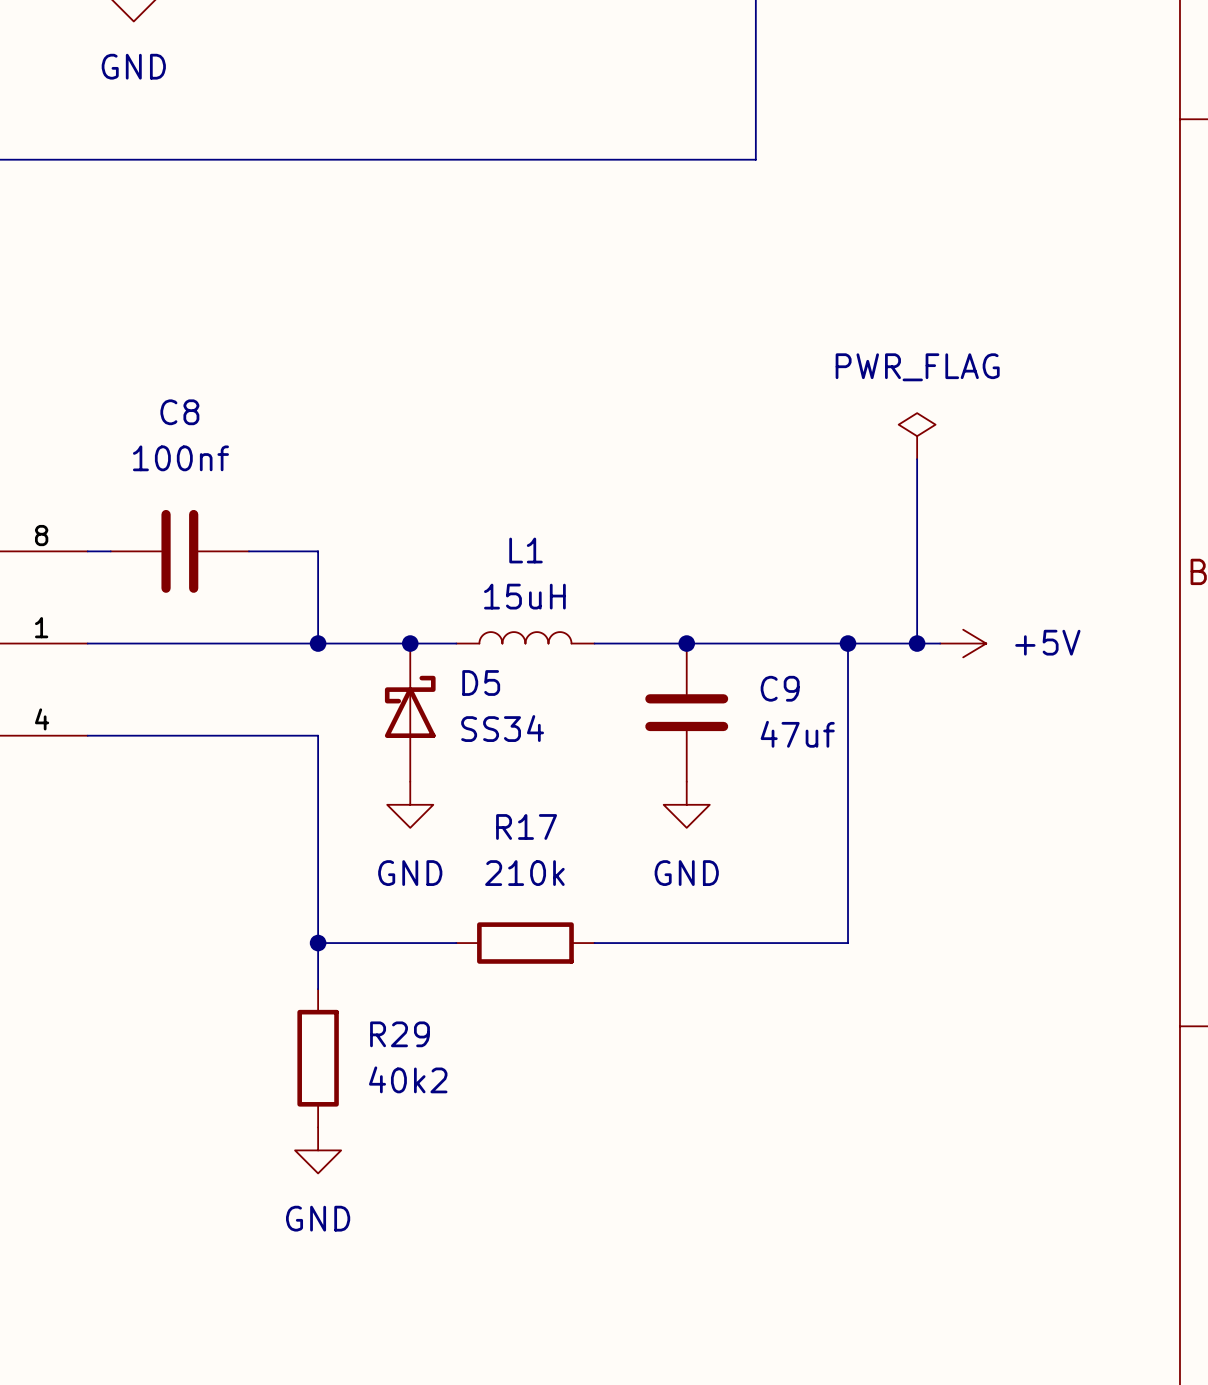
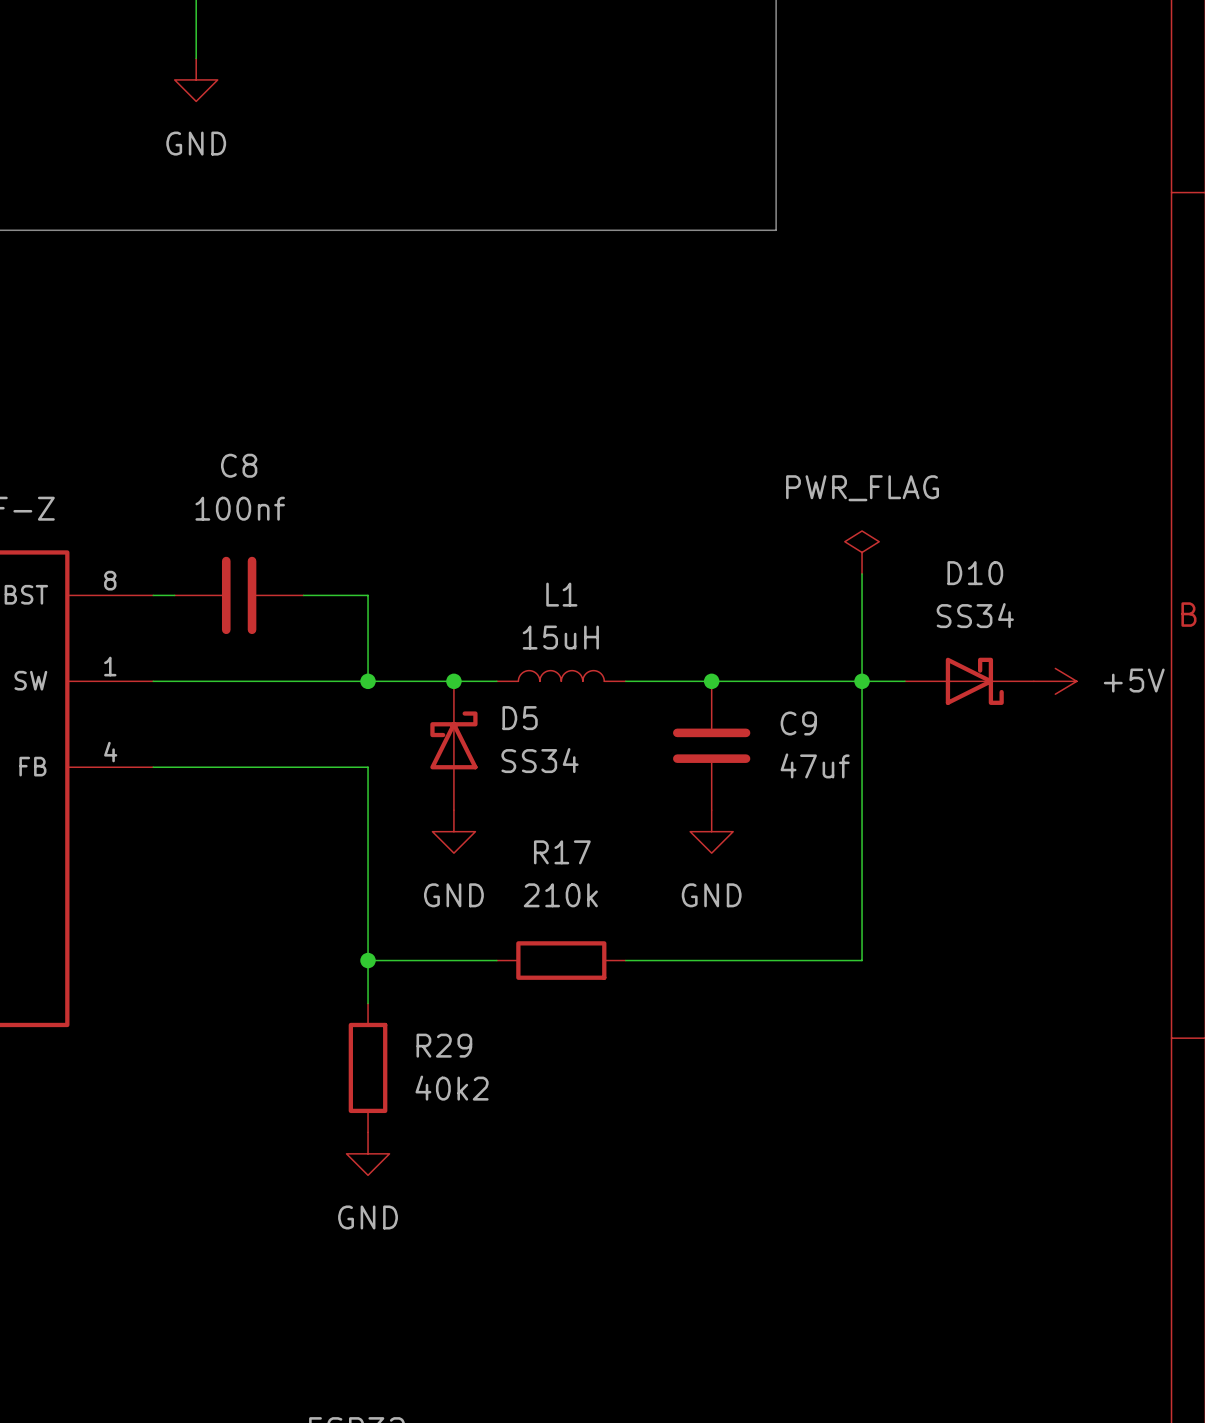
power symbol position: PWR_FLAG (917, 436) -> PWR_FLAG (862, 552)
wire: (917, 459) (917, 643) -> none
wire: none -> (862, 573) (862, 681)
junction: (917, 643) -> none
power symbol position: +5V (963, 643) -> +5V (1055, 681)
D10: none -> SS34 (969, 681)

